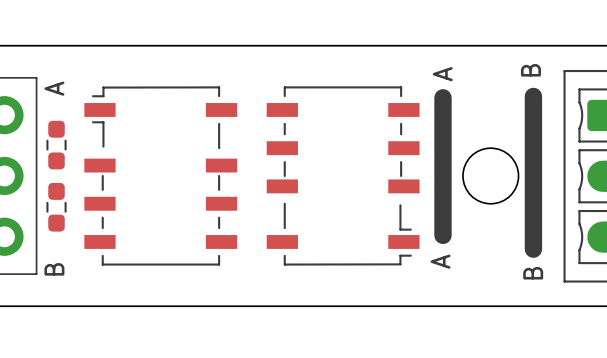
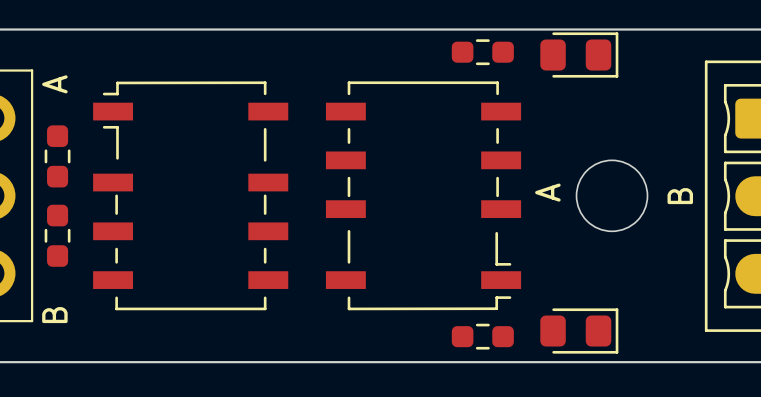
part: none -> (482, 52)
part: none -> (579, 55)
text: B (530, 70) -> none
text: A (442, 74) -> none
line: (533, 96) (533, 249) -> none
line: (442, 97) (442, 235) -> none
text: none -> A (547, 192)
text: none -> B (680, 196)
text: A (440, 261) -> none
text: B (533, 273) -> none
part: none -> (579, 331)
part: none -> (482, 336)

